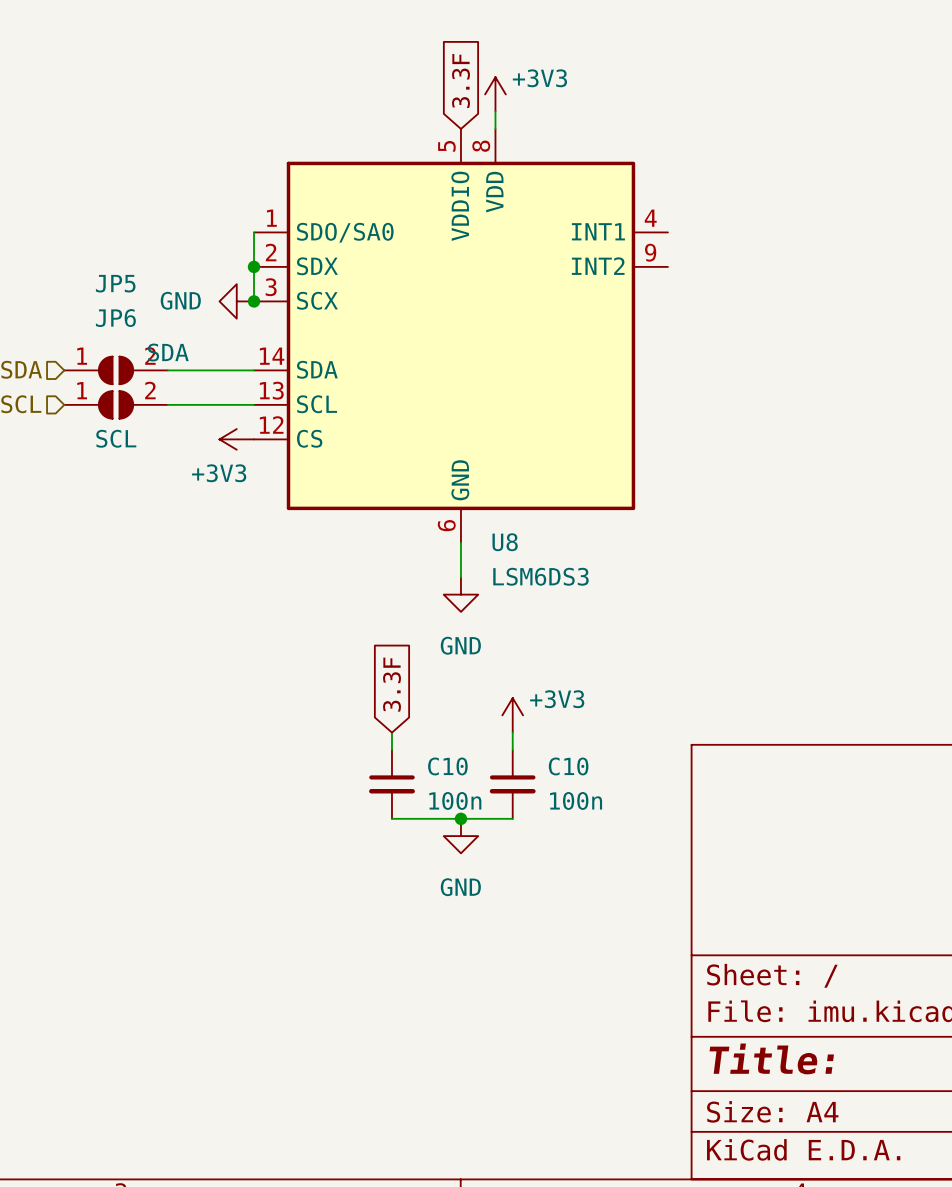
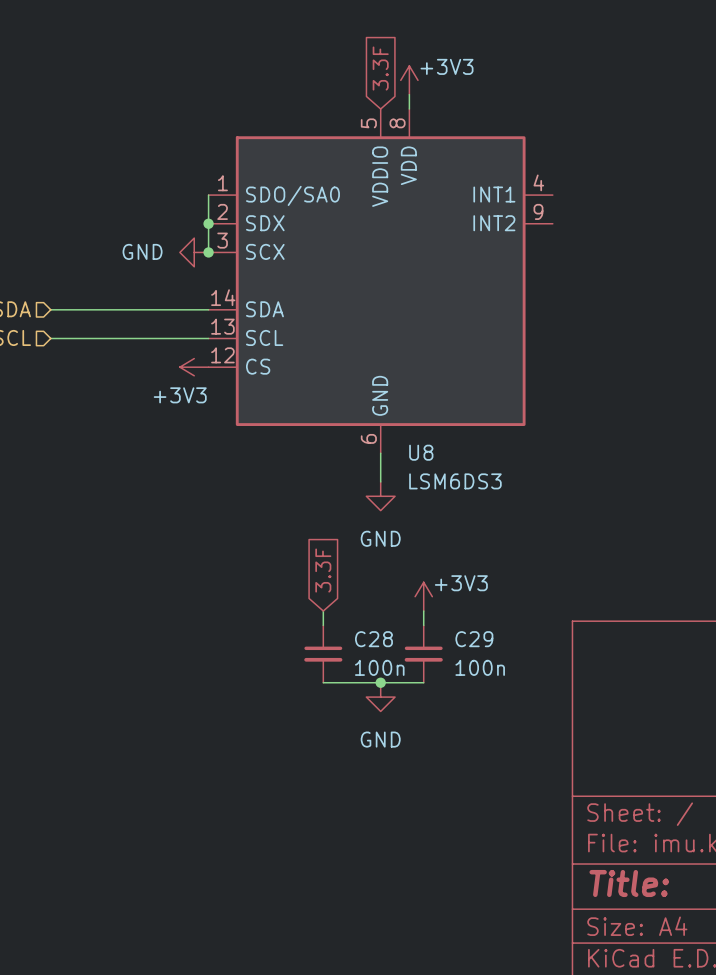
JP5: SDA (116, 370) -> none
JP6: SCL (116, 404) -> none
C10 name: C10 (447, 766) -> C28 (373, 639)
C10 name: C10 (568, 766) -> C29 (474, 639)

